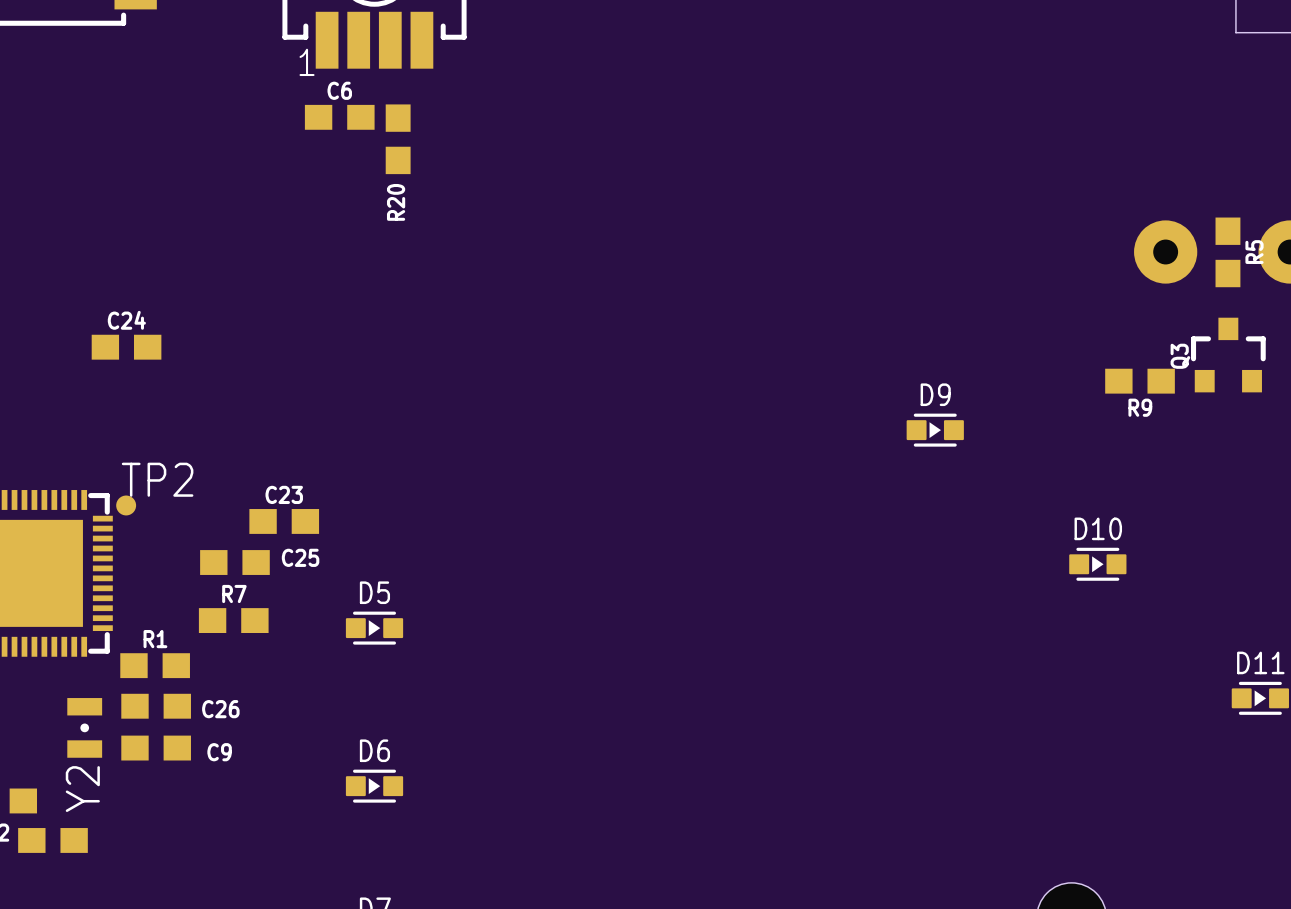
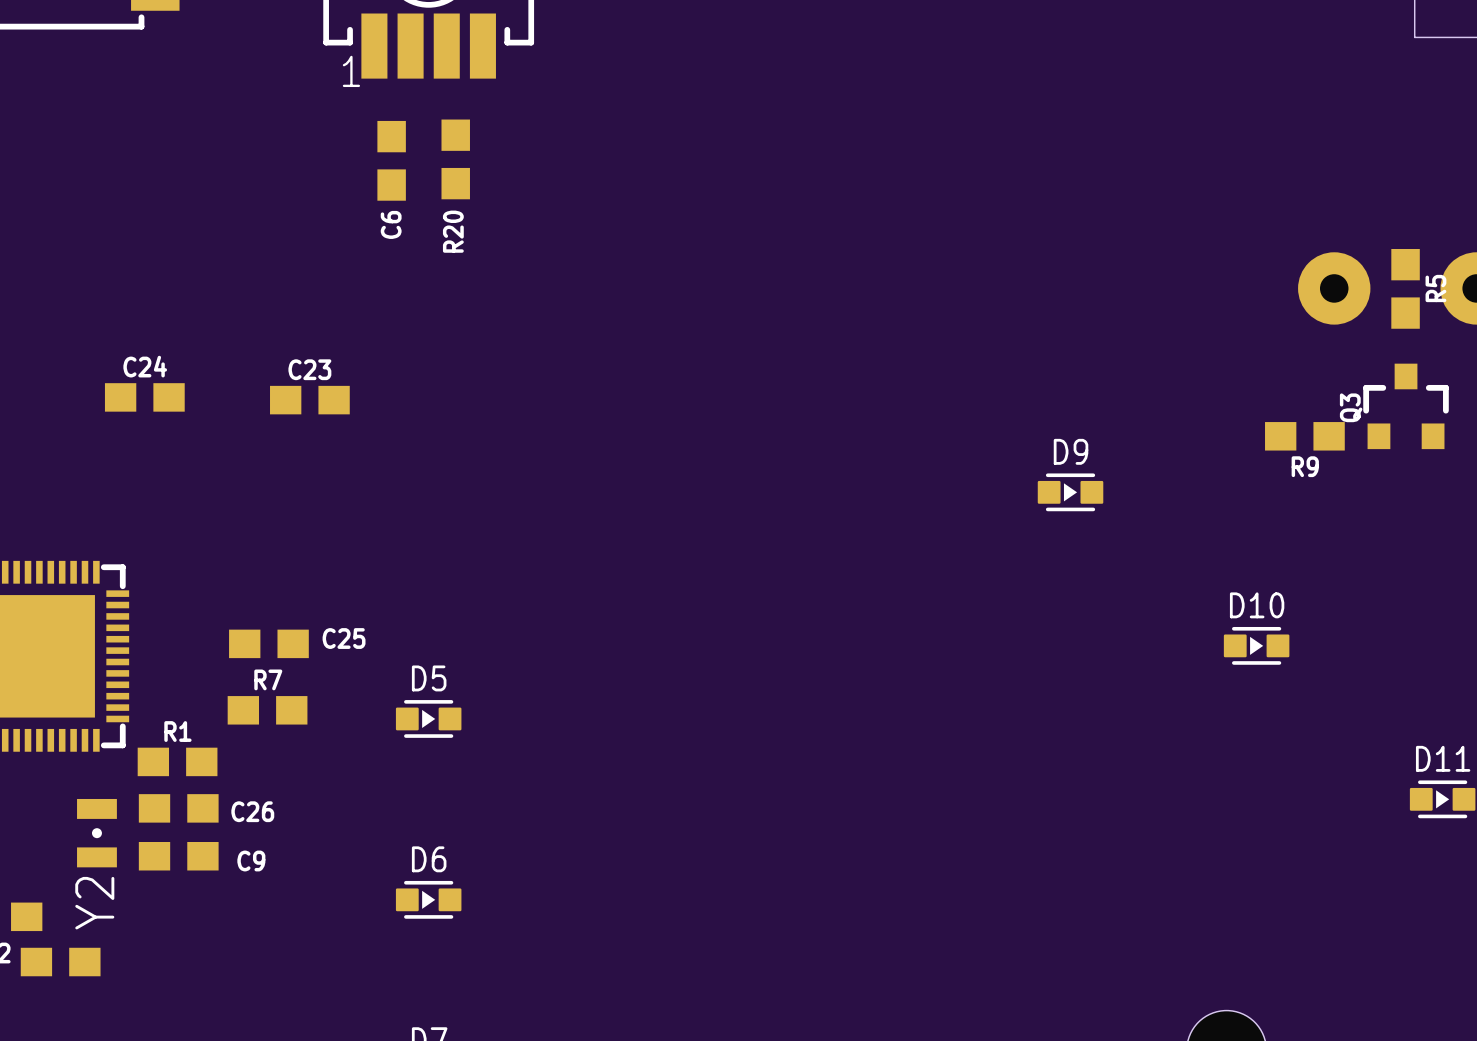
C6 name position: C6 (339, 90) -> C6 (391, 224)
C6 rotation: 0° (339, 117) -> 90° clockwise (391, 160)
TP2: (126, 505) -> none
C23 position: (284, 521) -> (309, 400)

